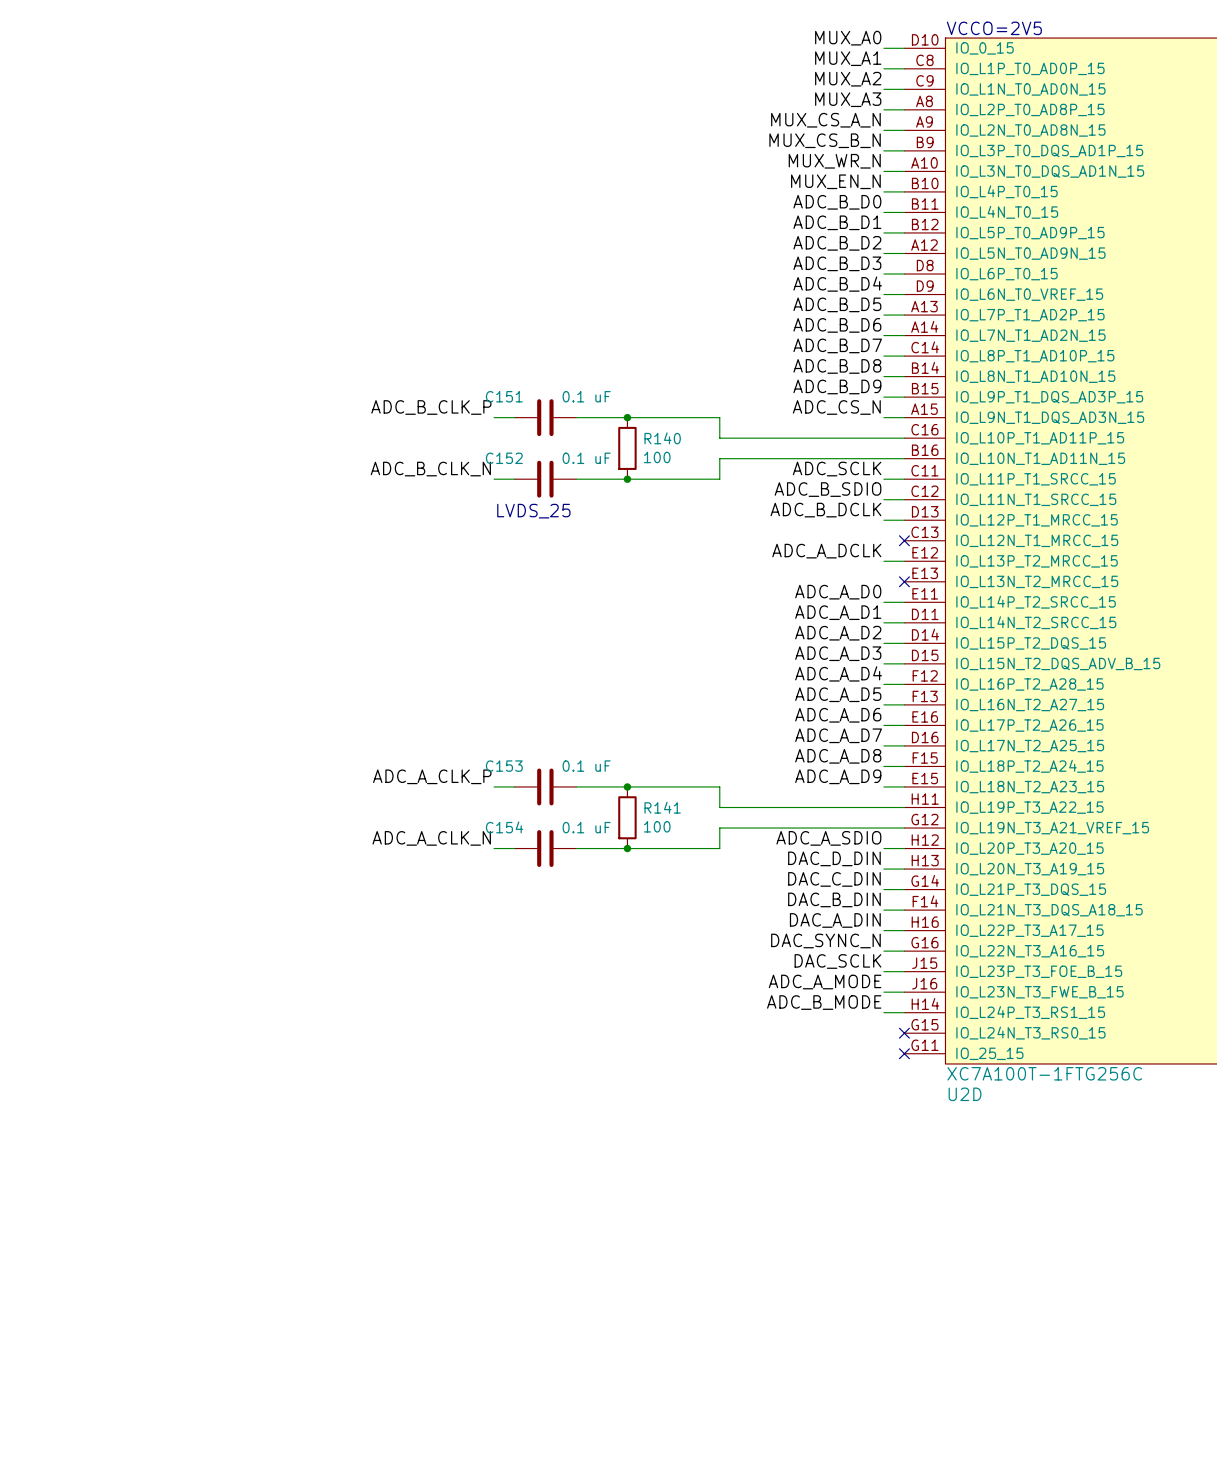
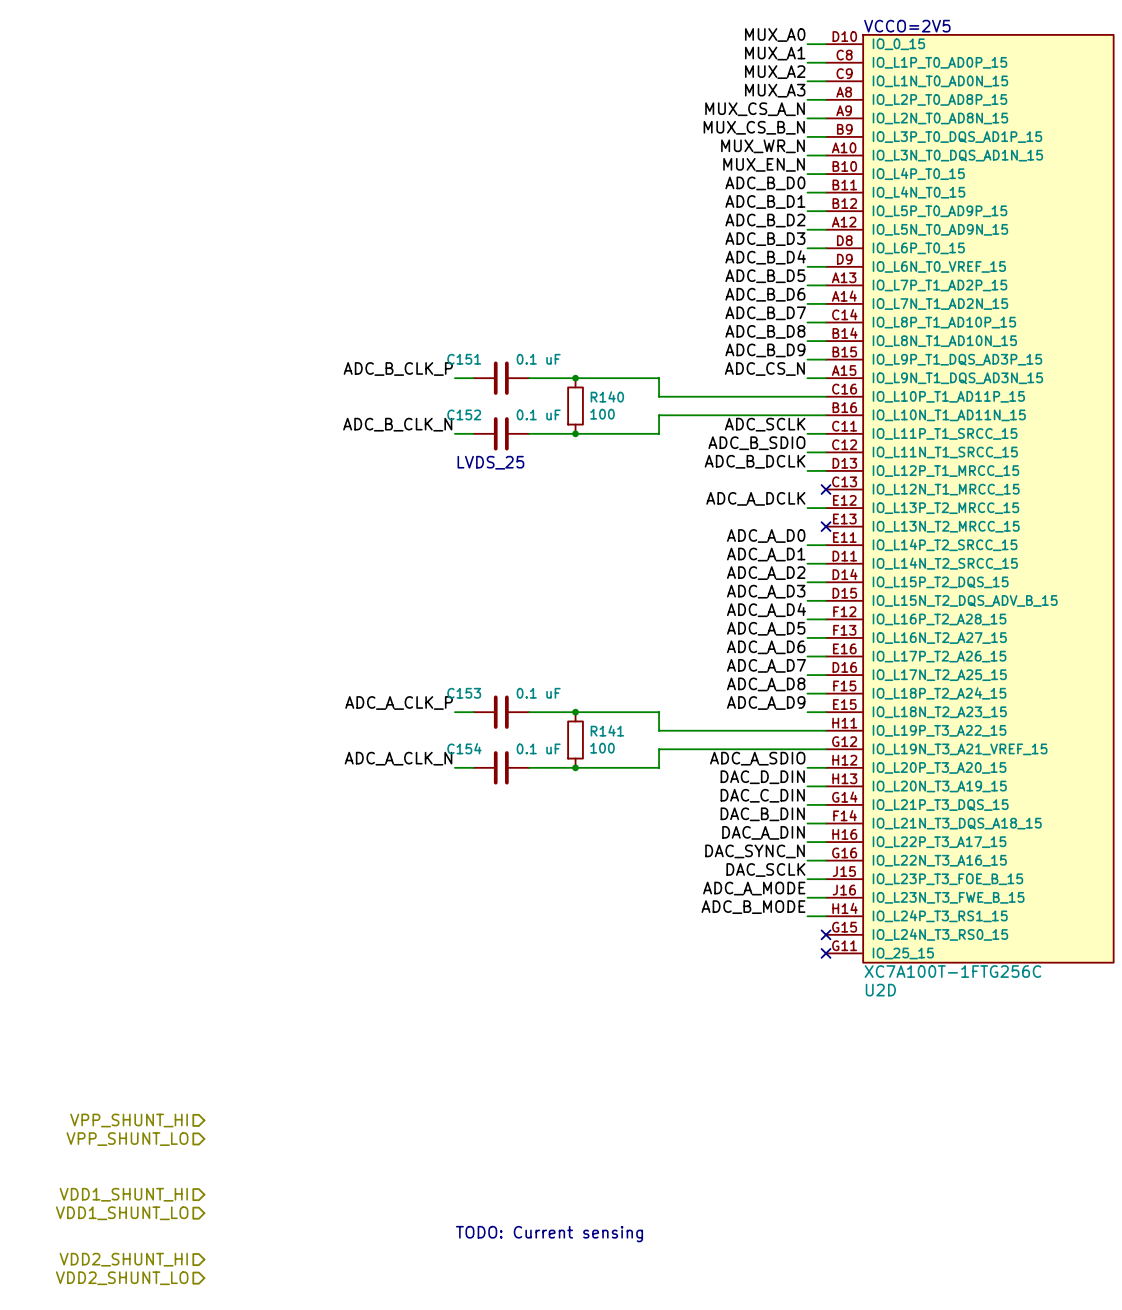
hierarchical label: none -> VPP_SHUNT_HI (129, 1120)
hierarchical label: none -> VPP_SHUNT_LO (127, 1139)
hierarchical label: none -> VDD1_SHUNT_HI (123, 1194)
hierarchical label: none -> VDD1_SHUNT_LO (122, 1213)
text: none -> TODO: Current sensing (549, 1234)
hierarchical label: none -> VDD2_SHUNT_HI (123, 1259)
hierarchical label: none -> VDD2_SHUNT_LO (122, 1278)

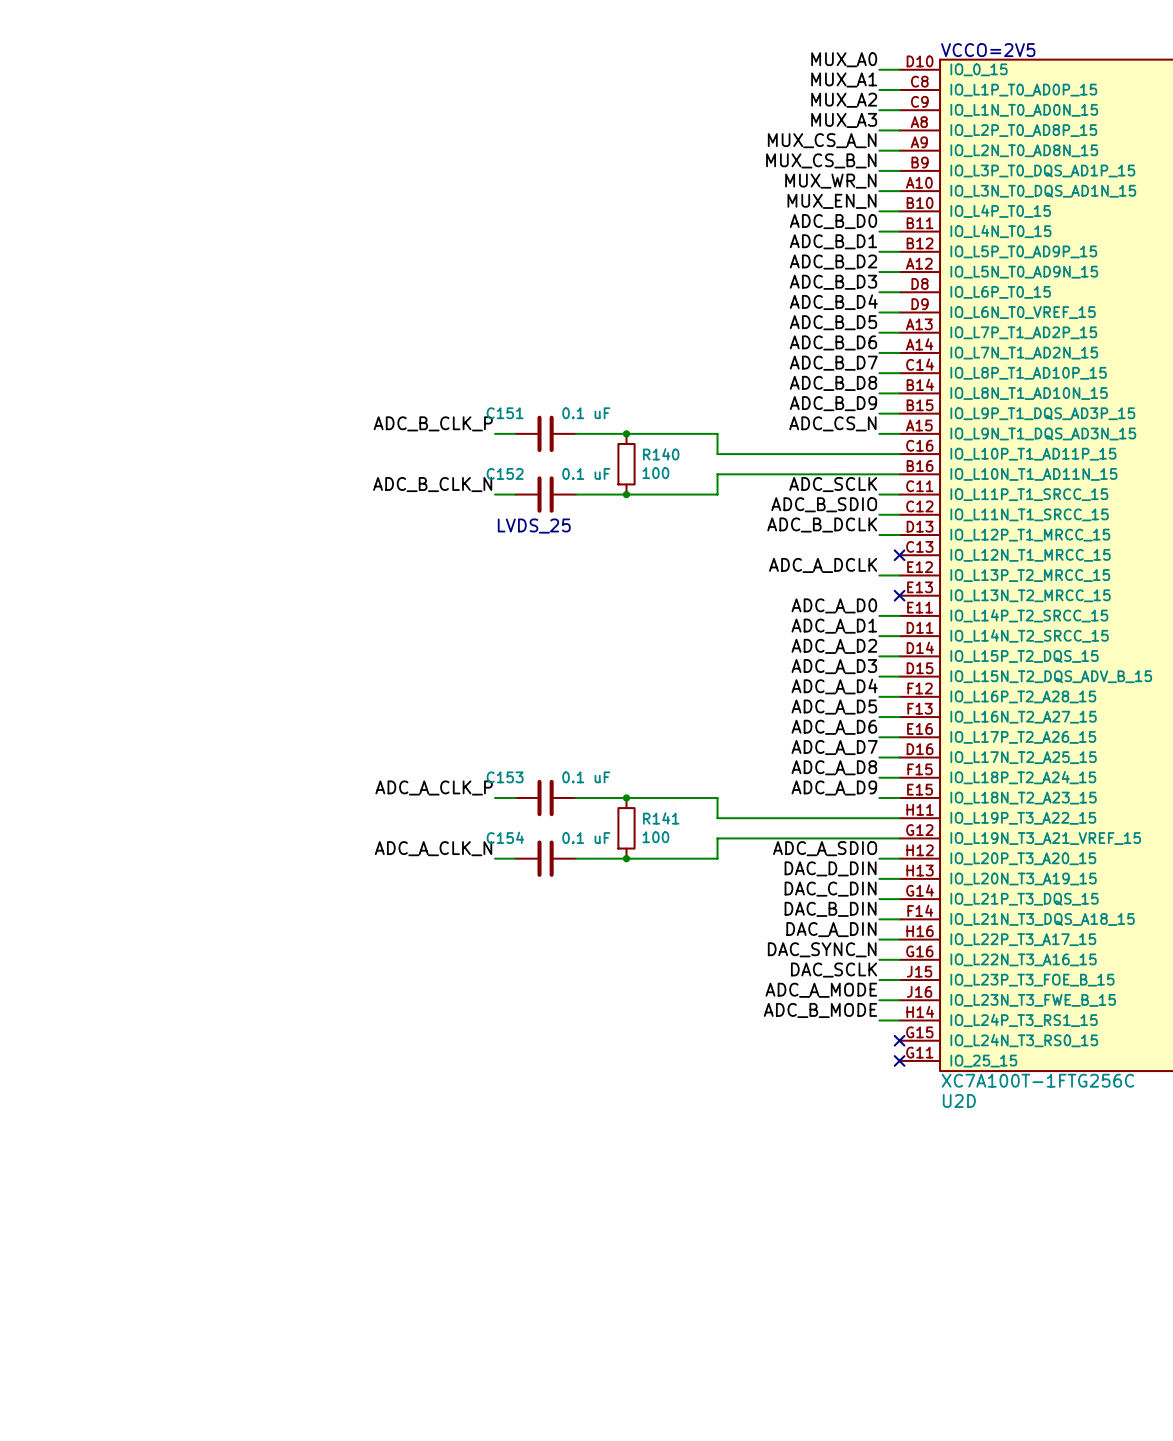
hierarchical label: VPP_SHUNT_HI (129, 1120) -> none
hierarchical label: VPP_SHUNT_LO (127, 1139) -> none
hierarchical label: VDD1_SHUNT_HI (123, 1194) -> none
hierarchical label: VDD1_SHUNT_LO (122, 1213) -> none
text: TODO: Current sensing (549, 1234) -> none
hierarchical label: VDD2_SHUNT_HI (123, 1259) -> none
hierarchical label: VDD2_SHUNT_LO (122, 1278) -> none

